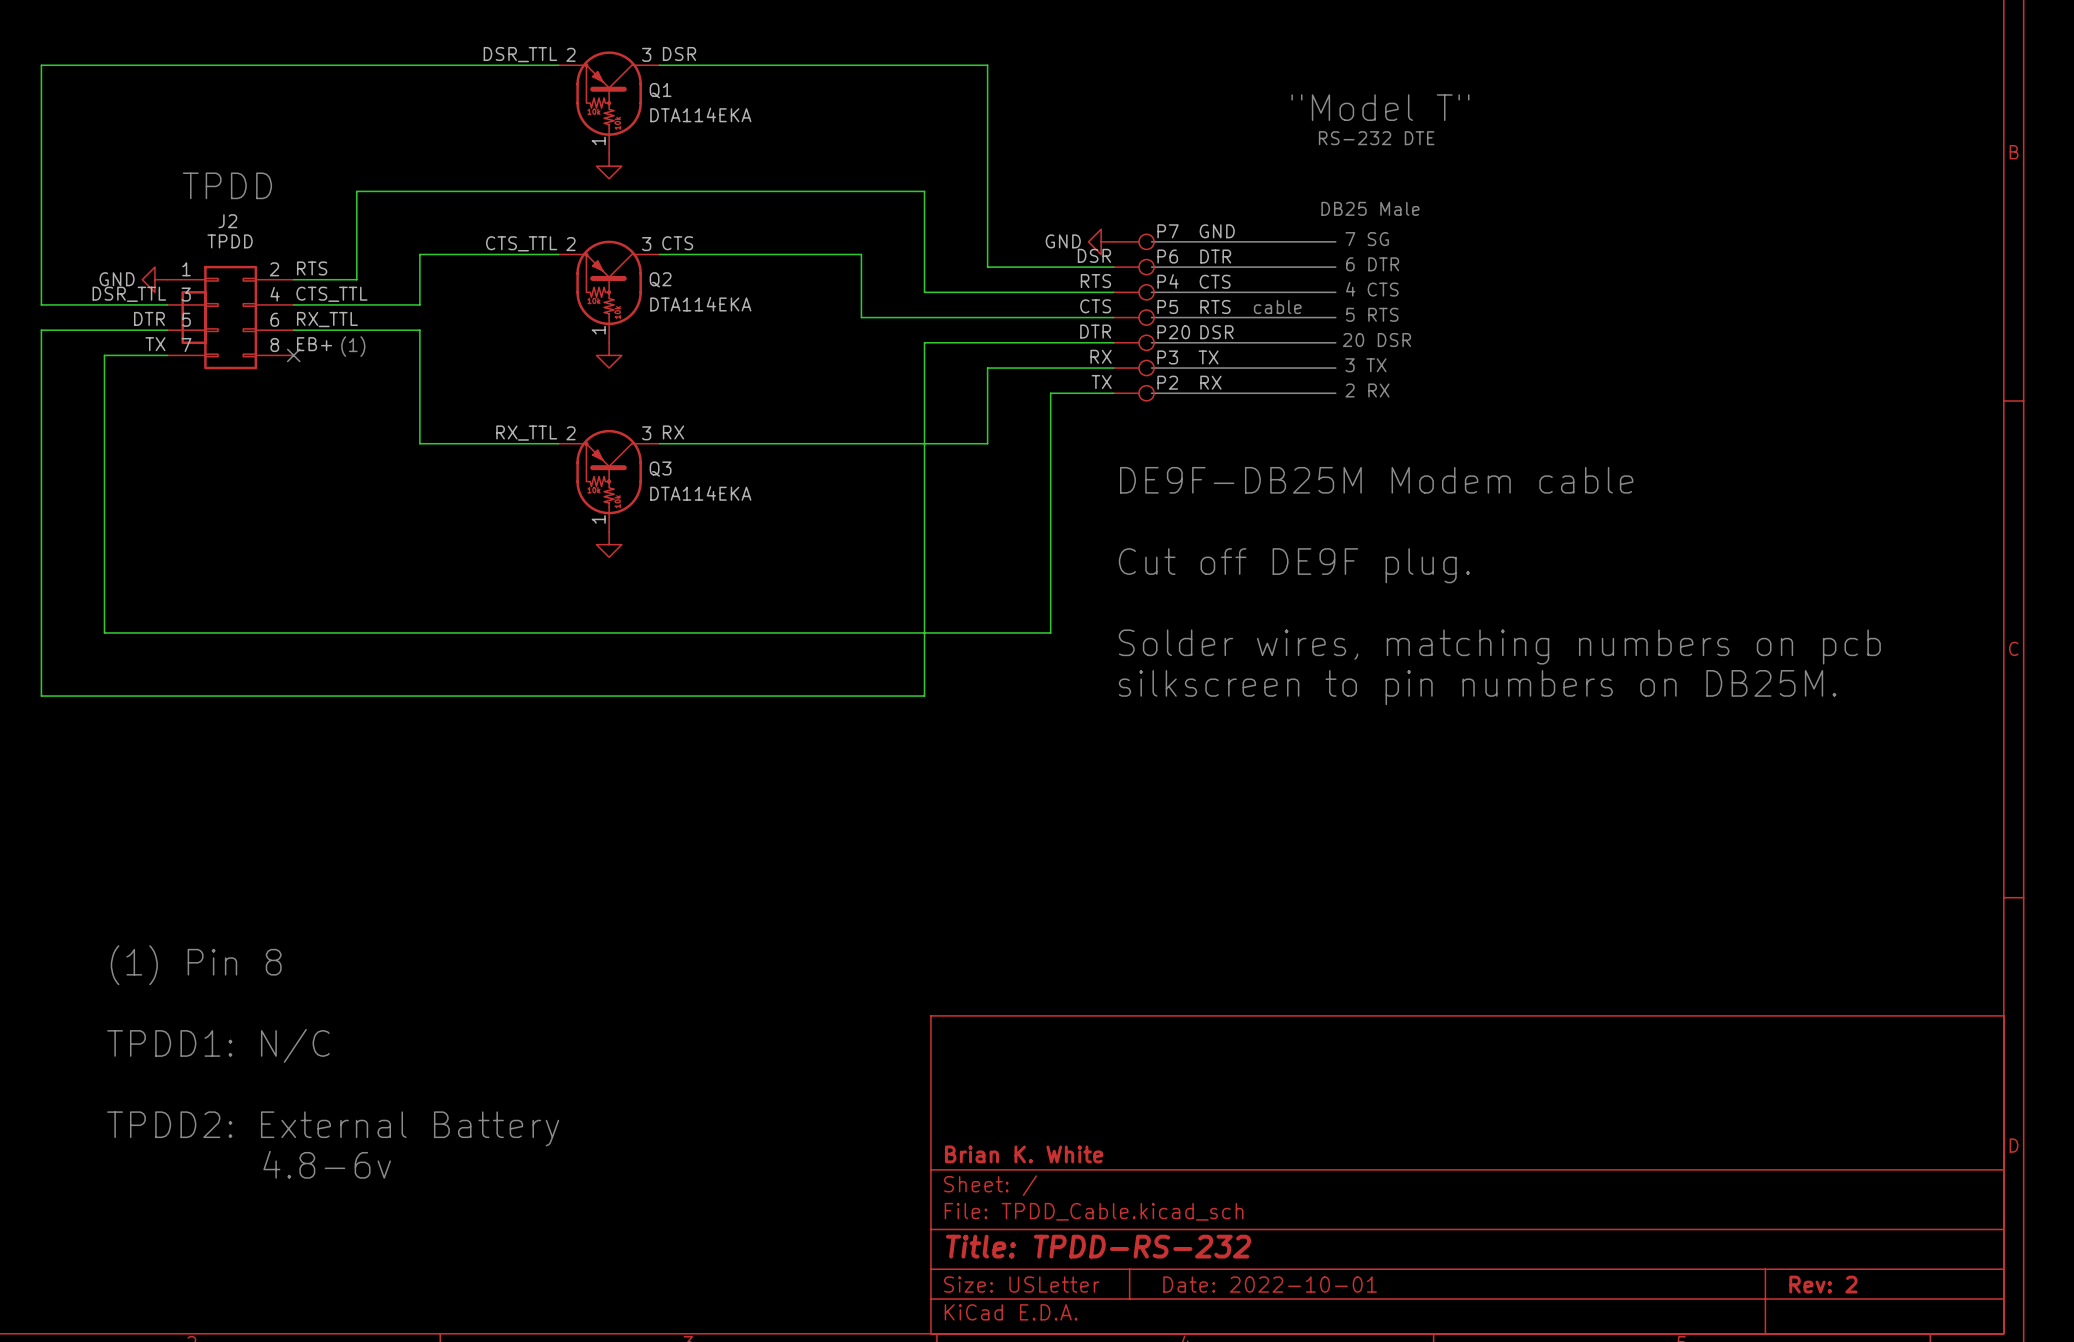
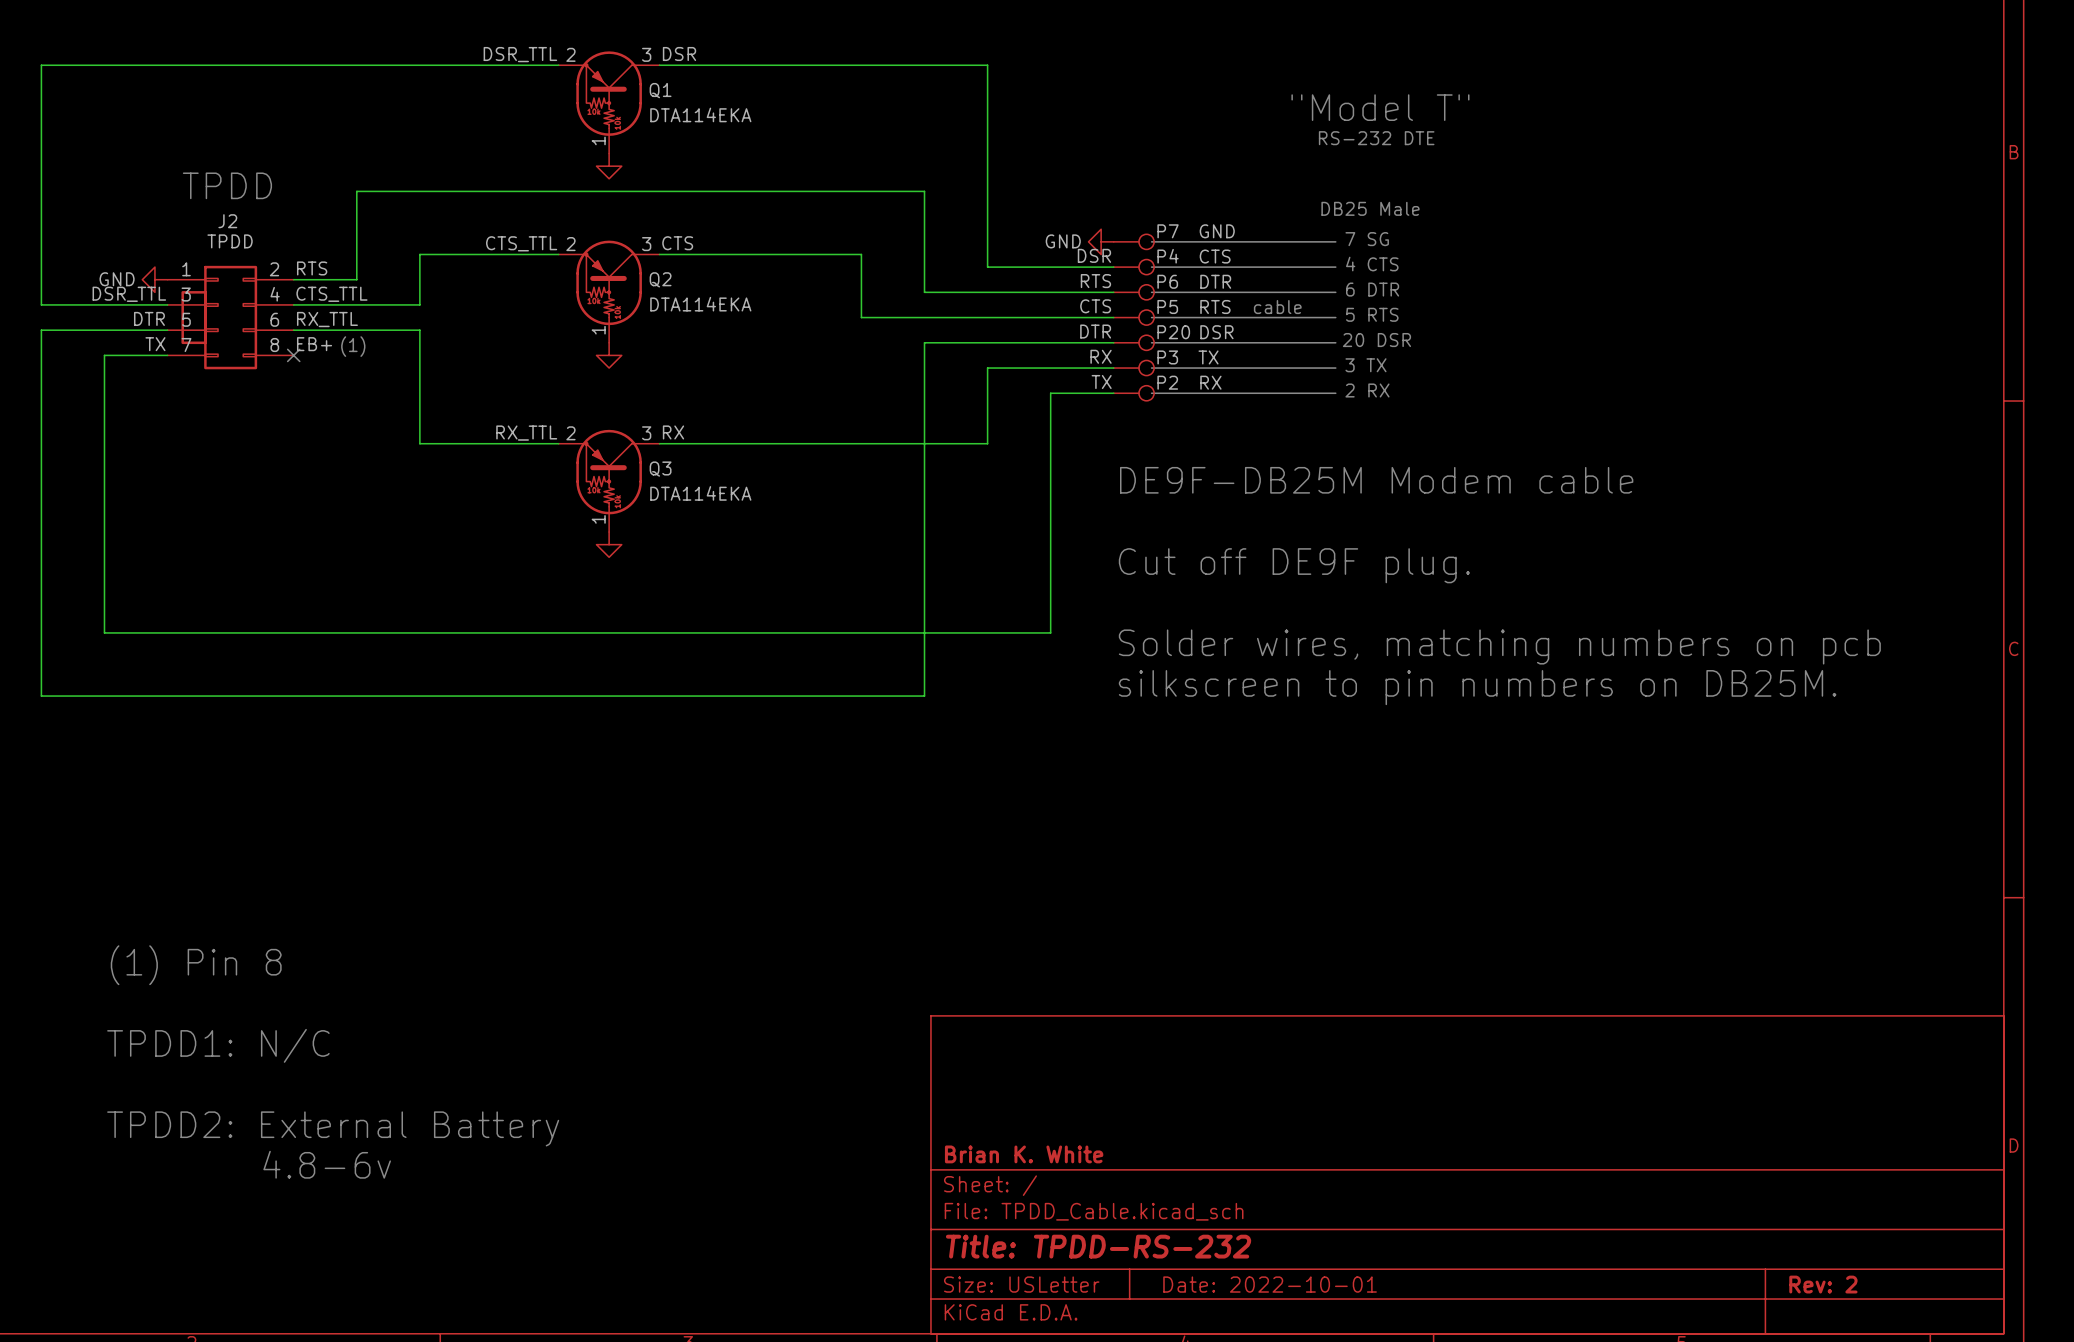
P6 name: P6 (1167, 256) -> P4 (1168, 256)
P6 value: DTR (1215, 256) -> CTS (1215, 256)
text: 6 DTR (1372, 264) -> 4 CTS (1372, 264)
P4 name: P4 (1168, 281) -> P6 (1167, 281)
P4 value: CTS (1215, 281) -> DTR (1215, 281)
text: 4 CTS (1372, 289) -> 6 DTR (1372, 289)

